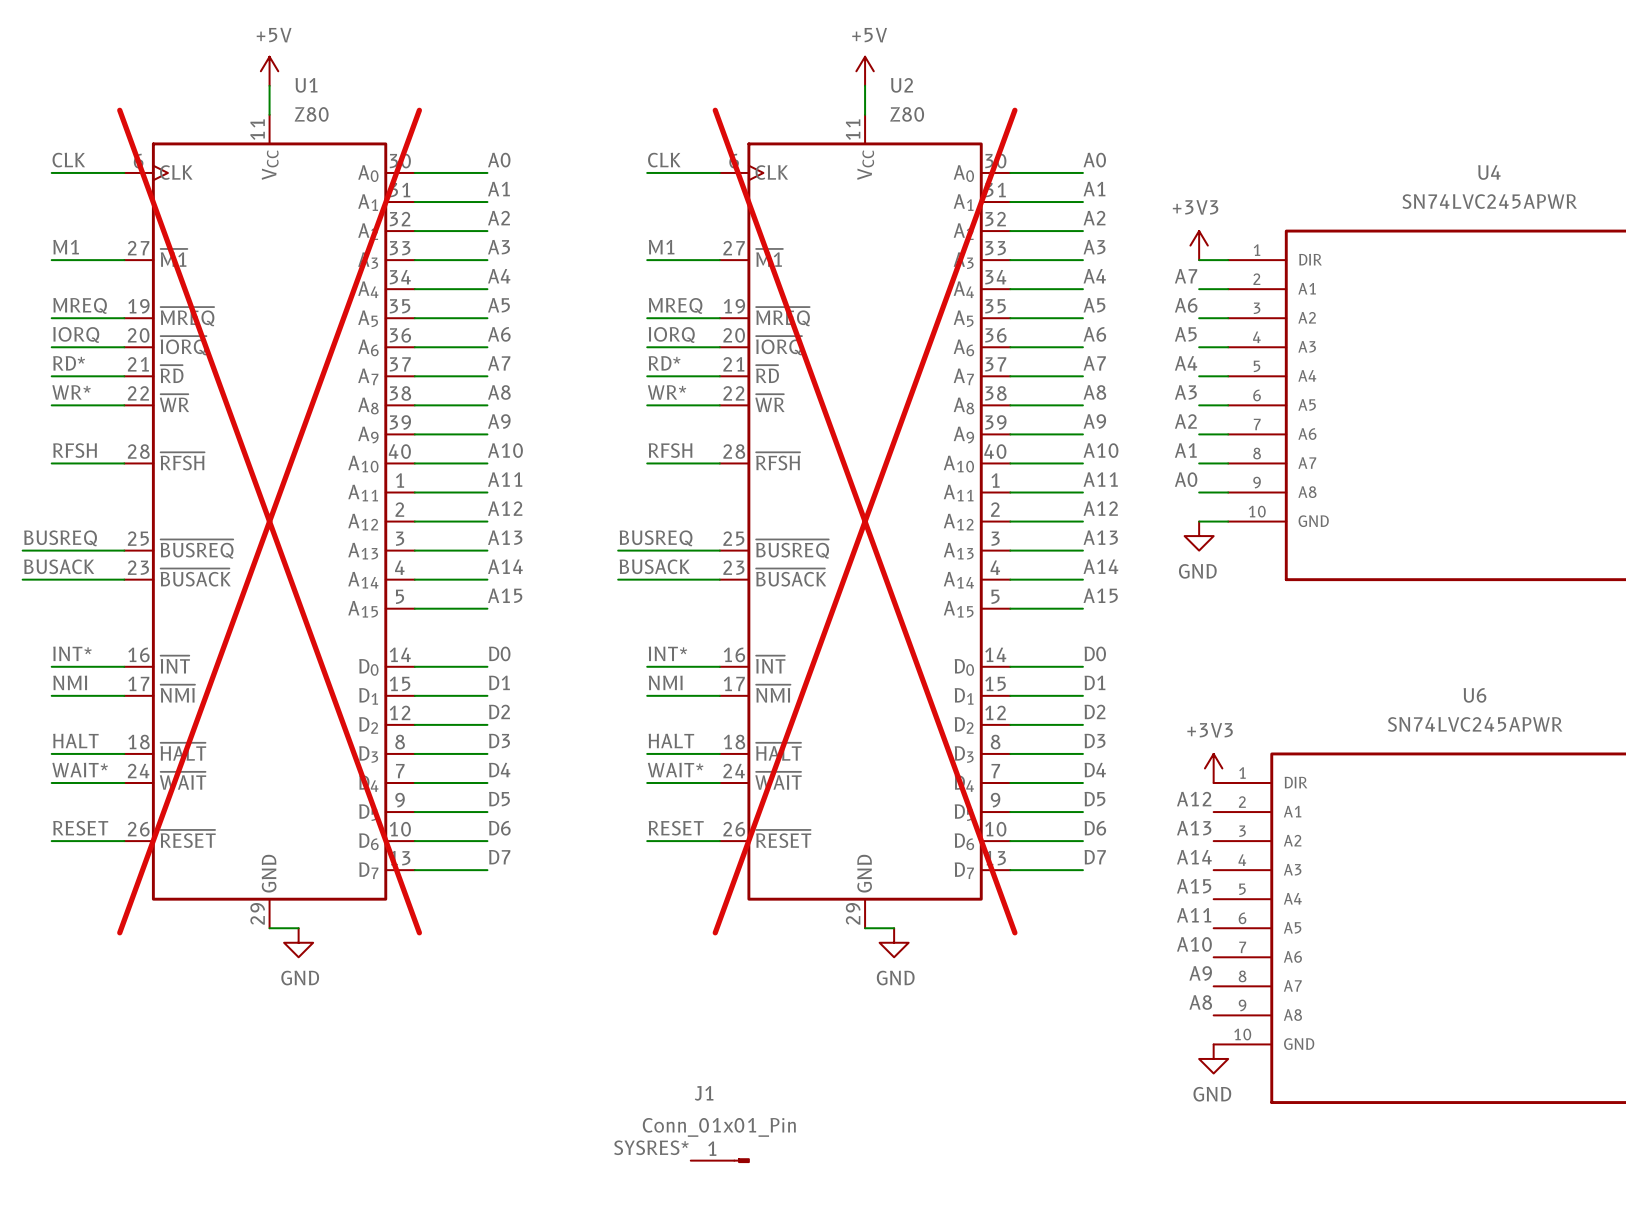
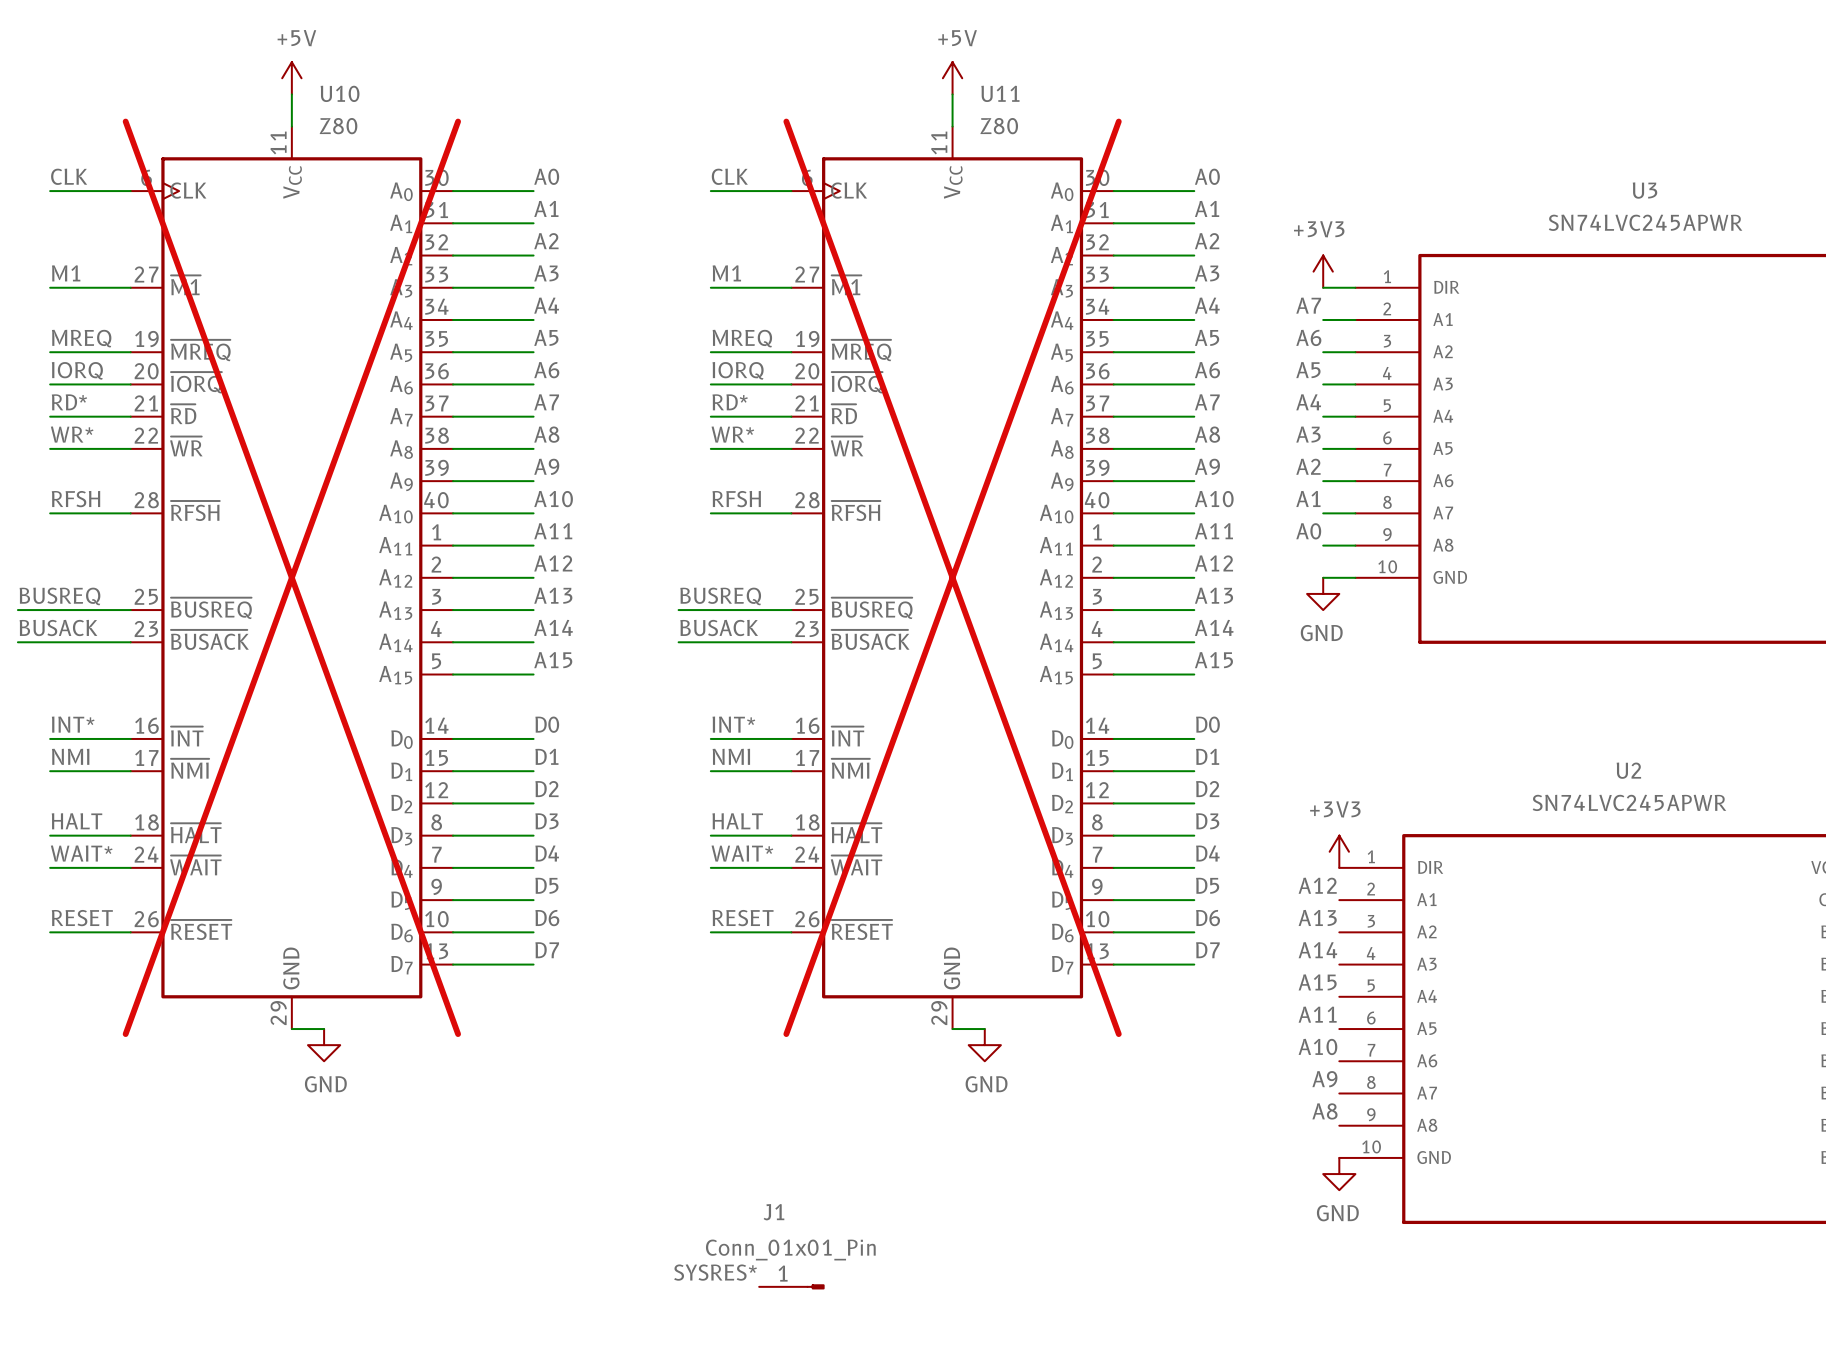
U1 name: U1 (306, 85) -> U10 (340, 93)
U2 name: U2 (902, 85) -> U11 (1000, 93)
U4 name: U4 (1489, 172) -> U3 (1645, 190)
U6 name: U6 (1474, 695) -> U2 (1628, 770)

